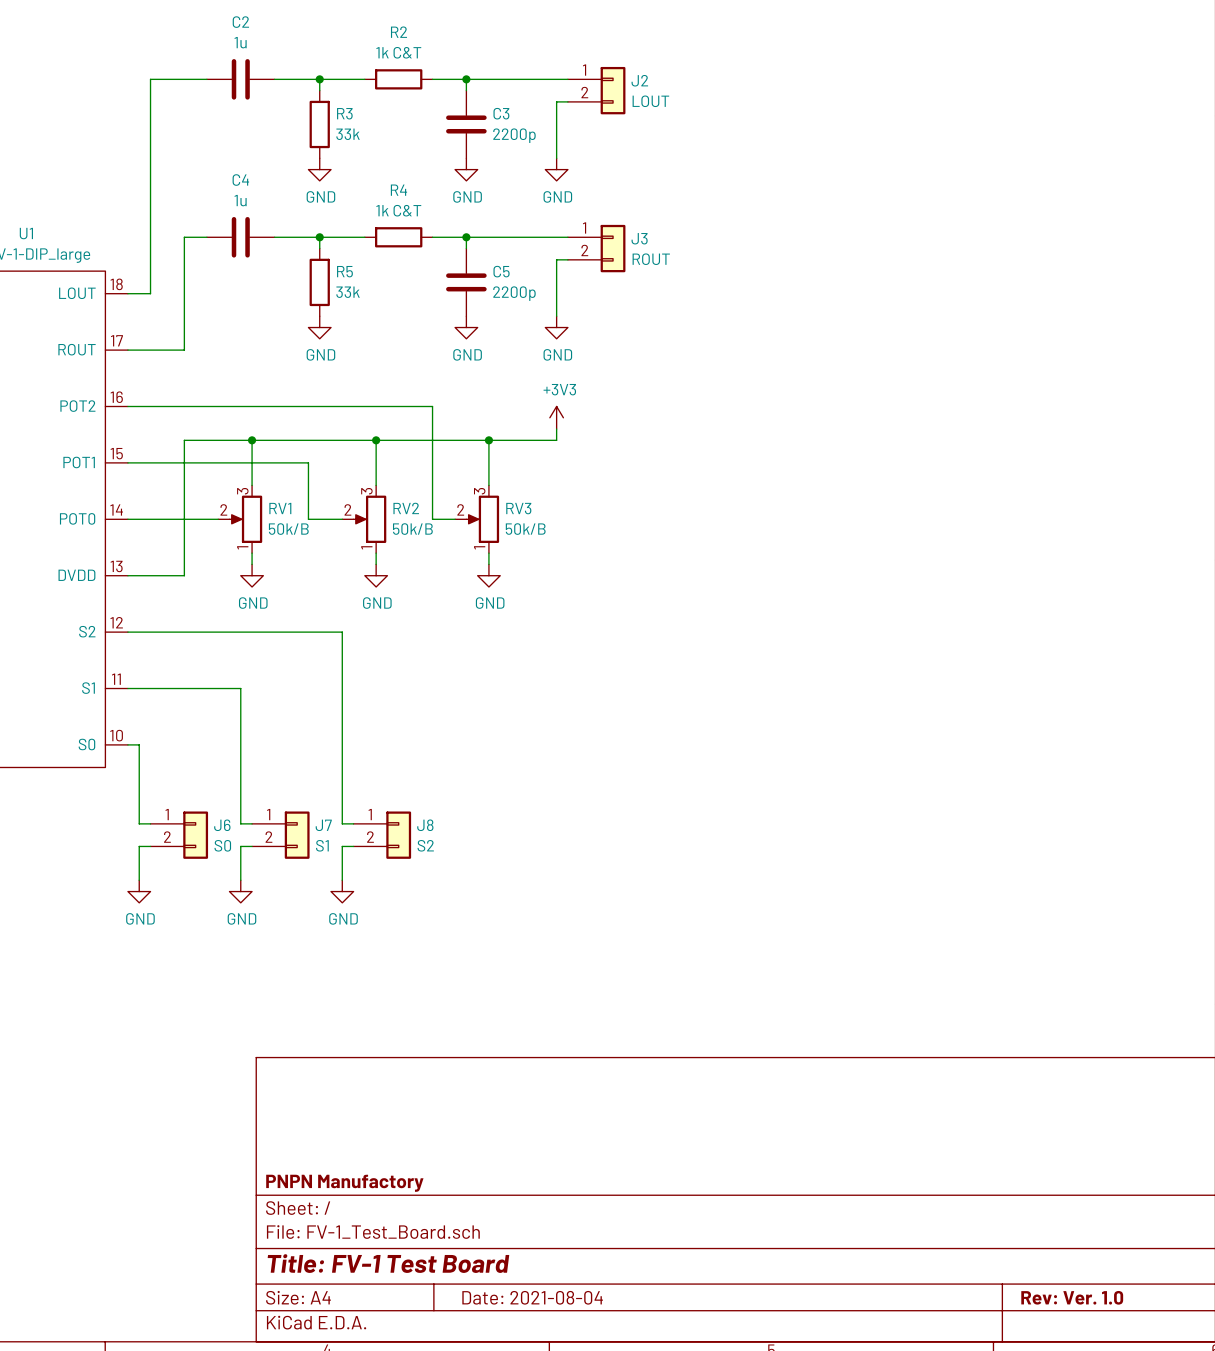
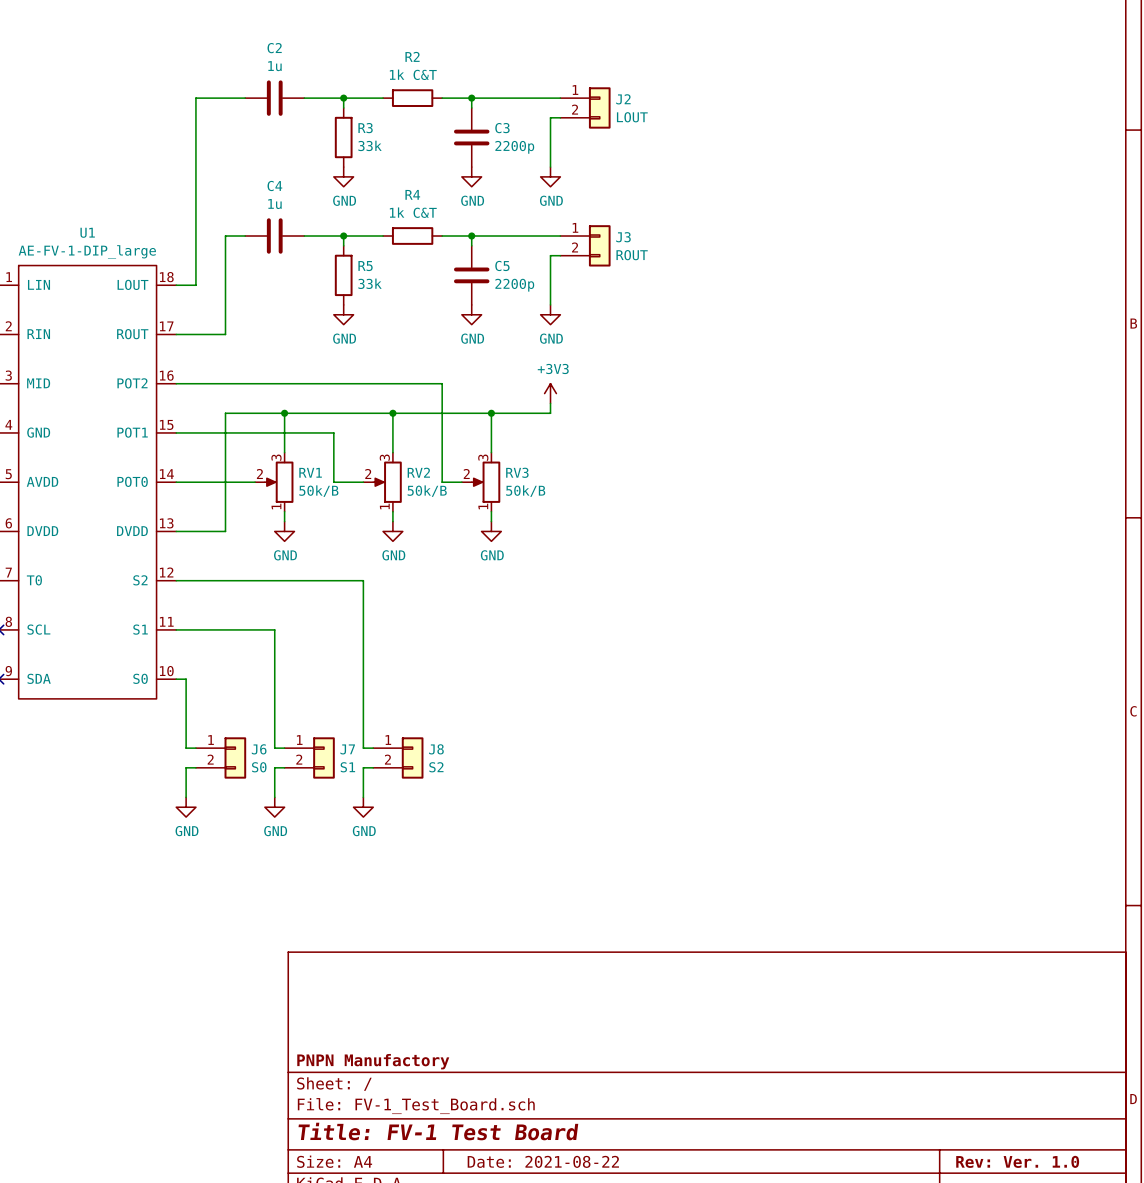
title block: Date: 2021-08-04 (532, 1297) -> Date: 2021-08-22 (543, 1161)

